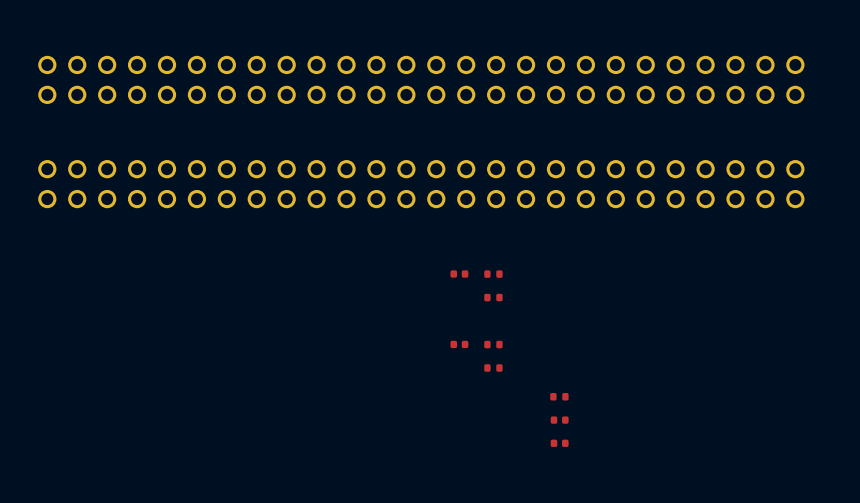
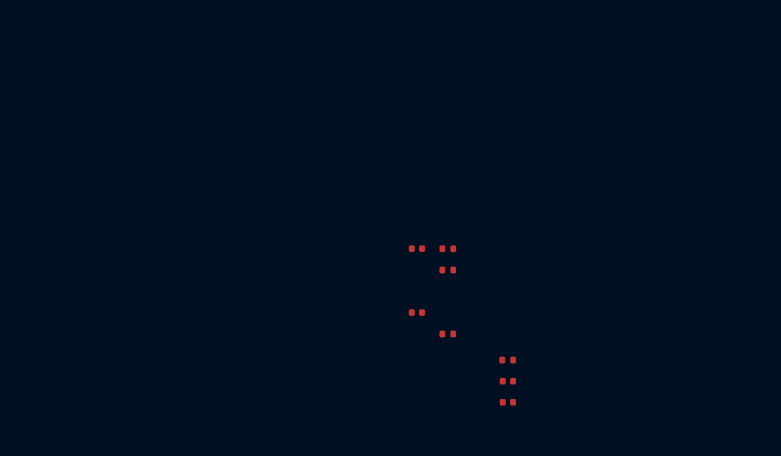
part: (421, 79) -> none
part: (421, 184) -> none
part: (493, 344) -> none

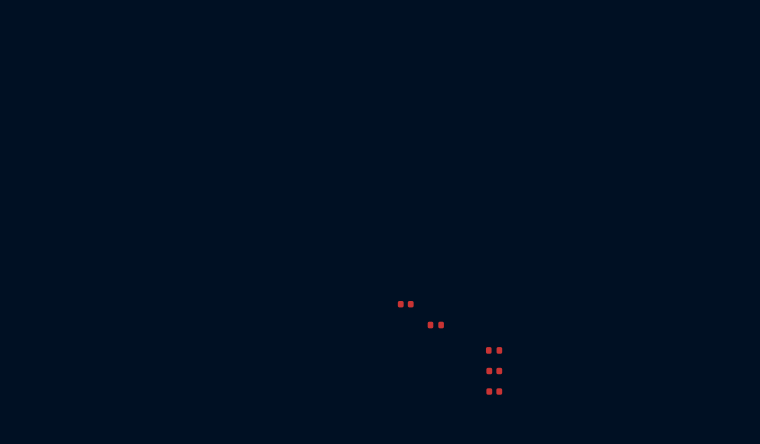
part: (416, 248) -> none
part: (447, 248) -> none
part: (447, 270) -> none

